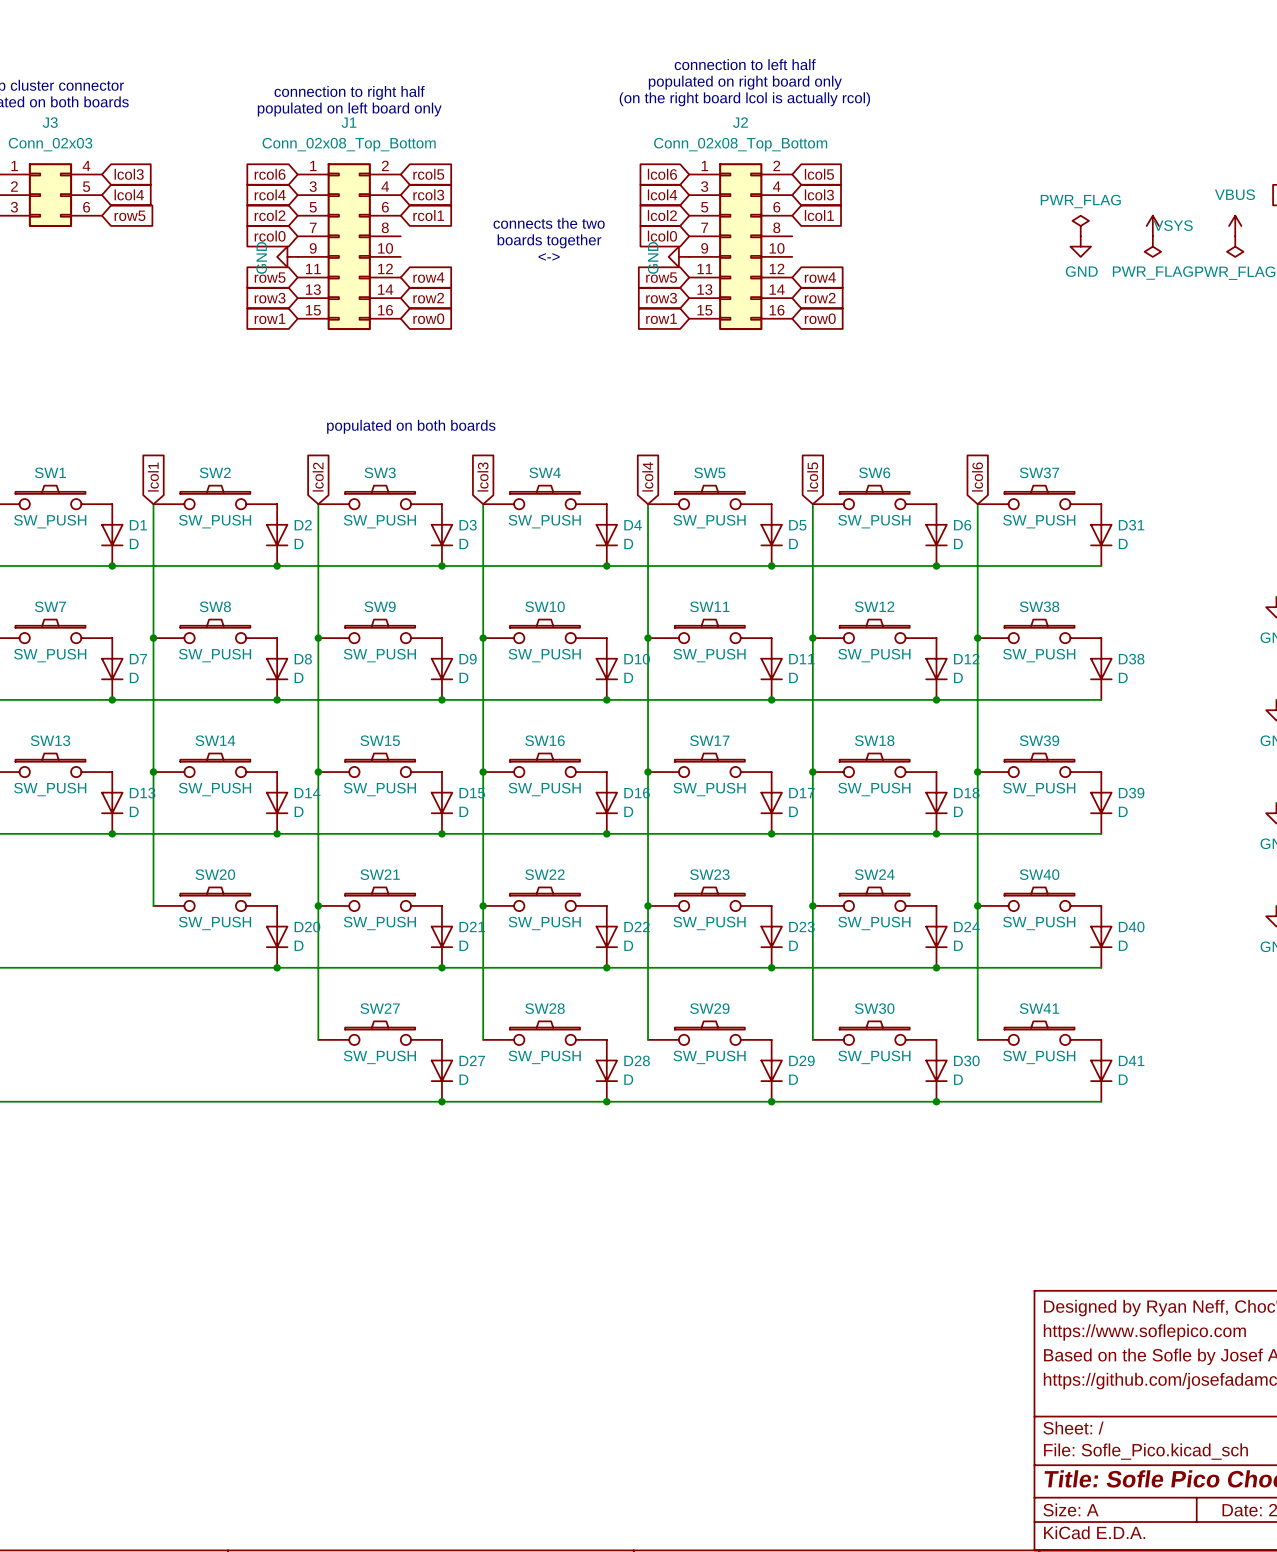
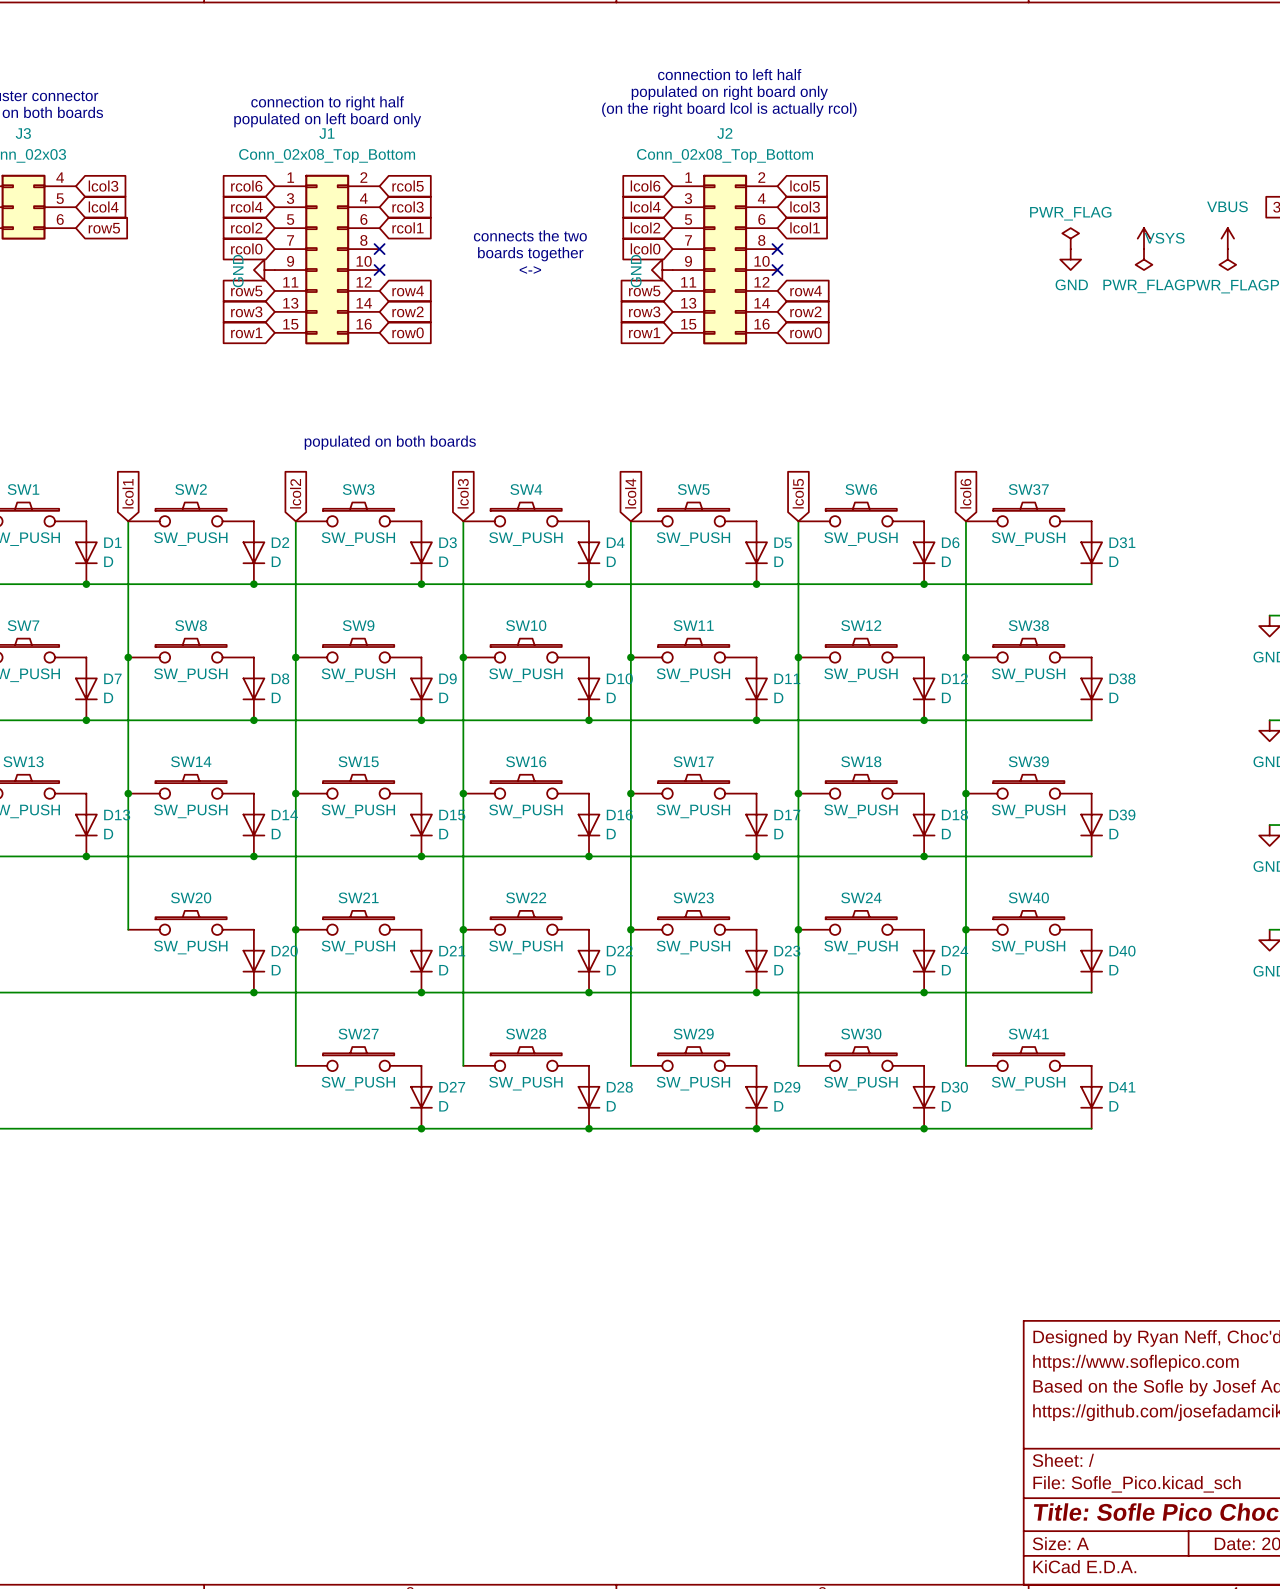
no-connect mark: none -> (379, 249)
no-connect mark: none -> (777, 249)
no-connect mark: none -> (379, 270)
no-connect mark: none -> (777, 270)

